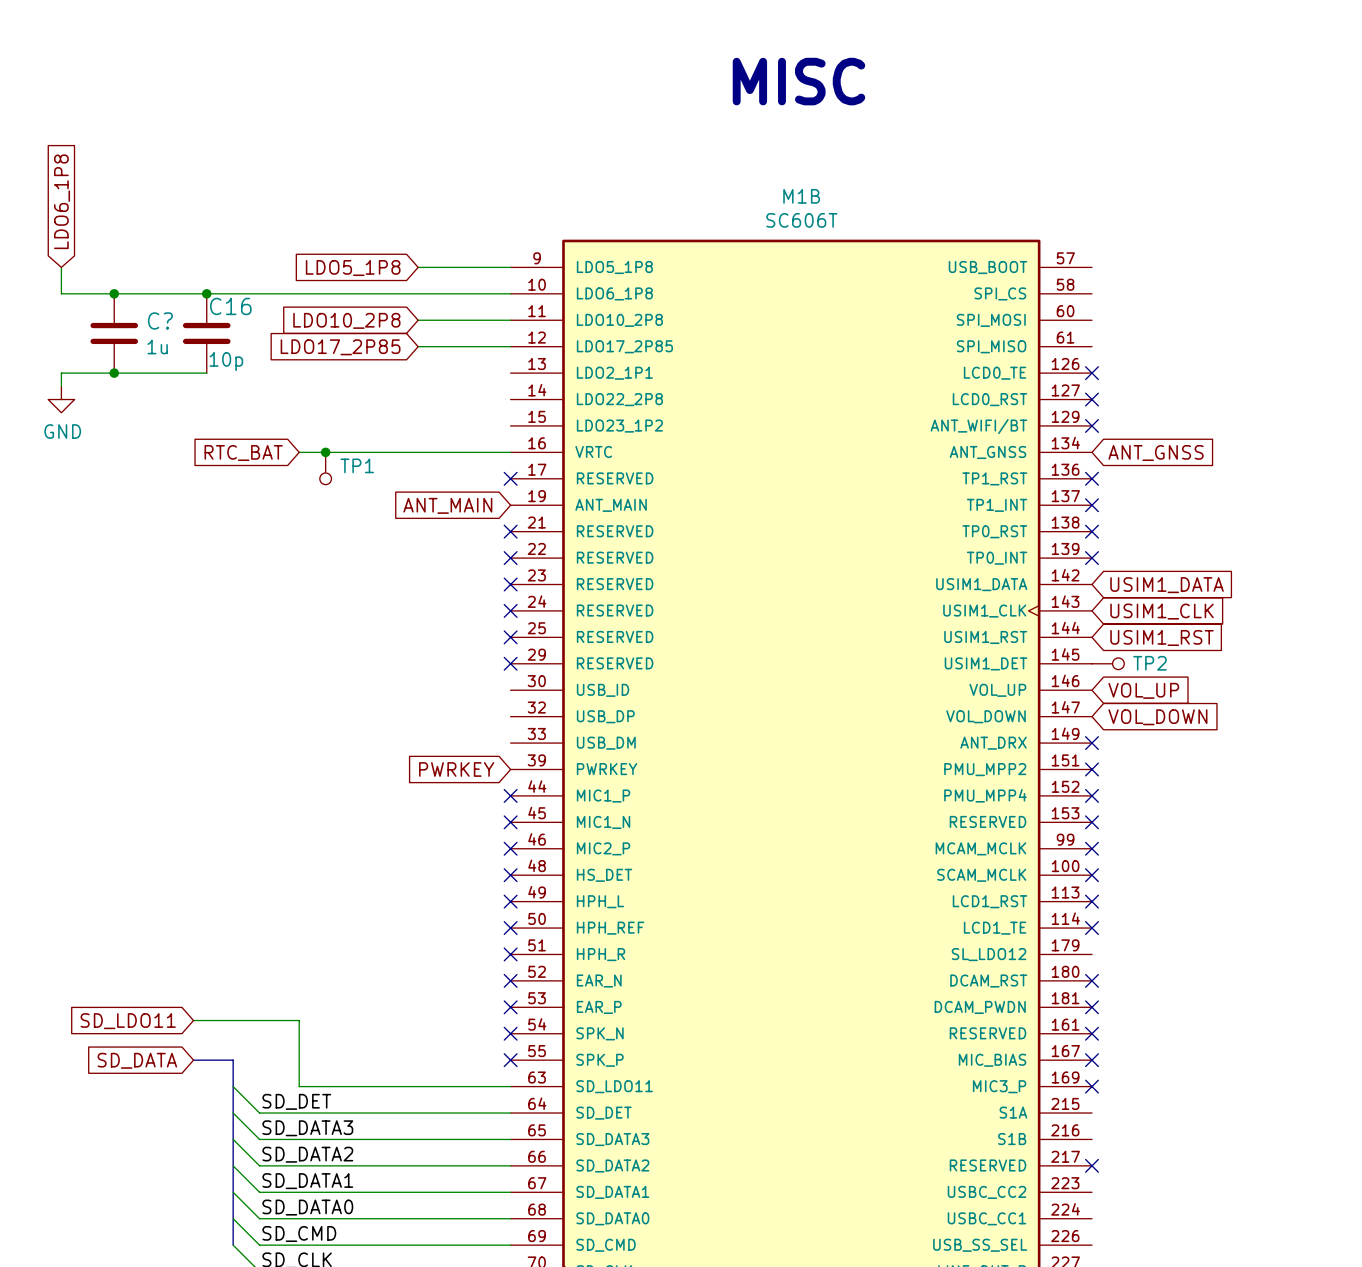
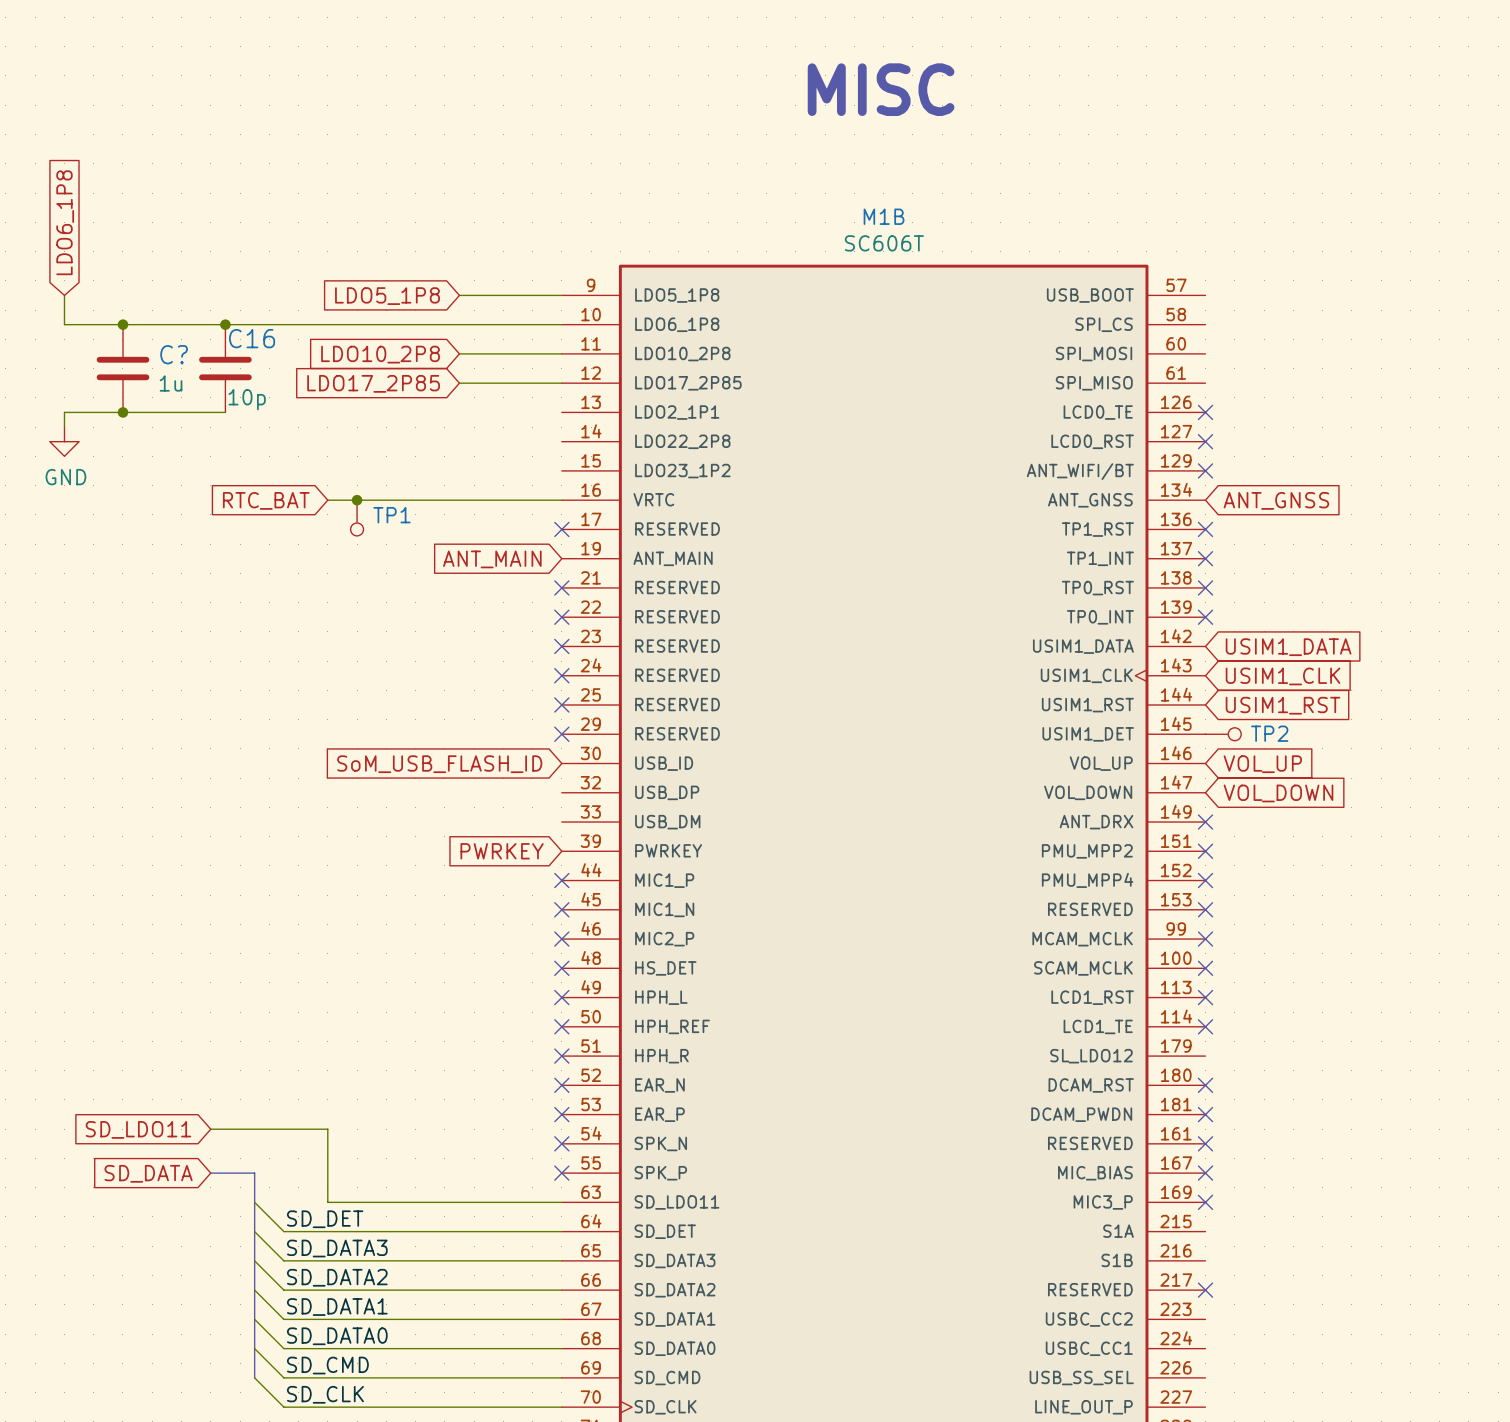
global label: none -> SoM_USB_FLASH_ID (439, 764)

